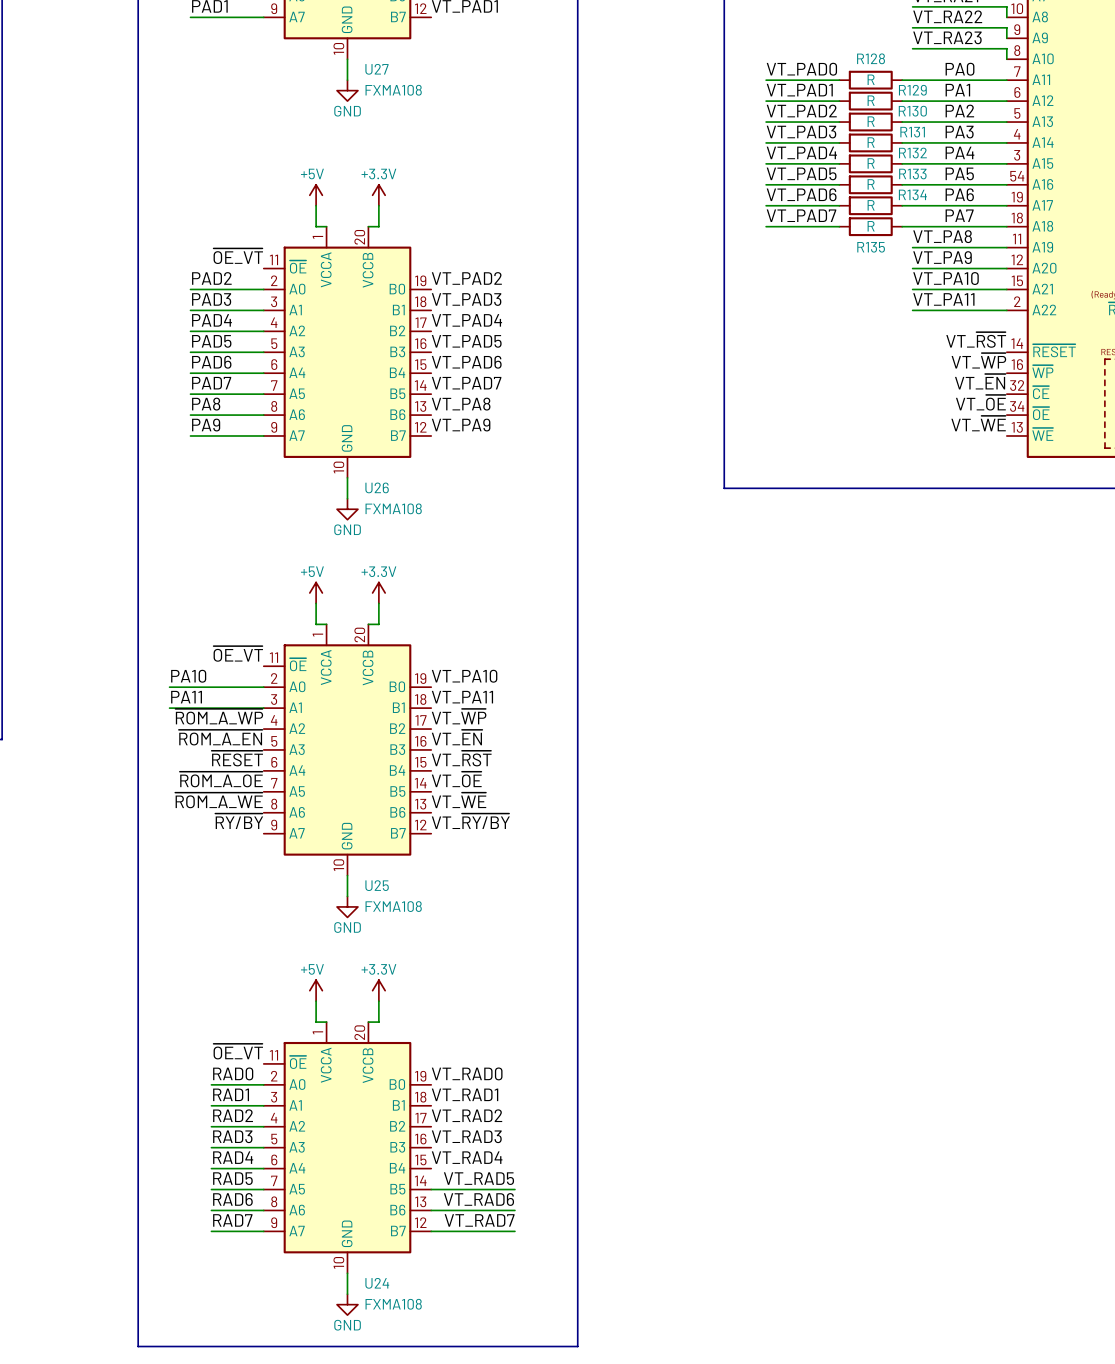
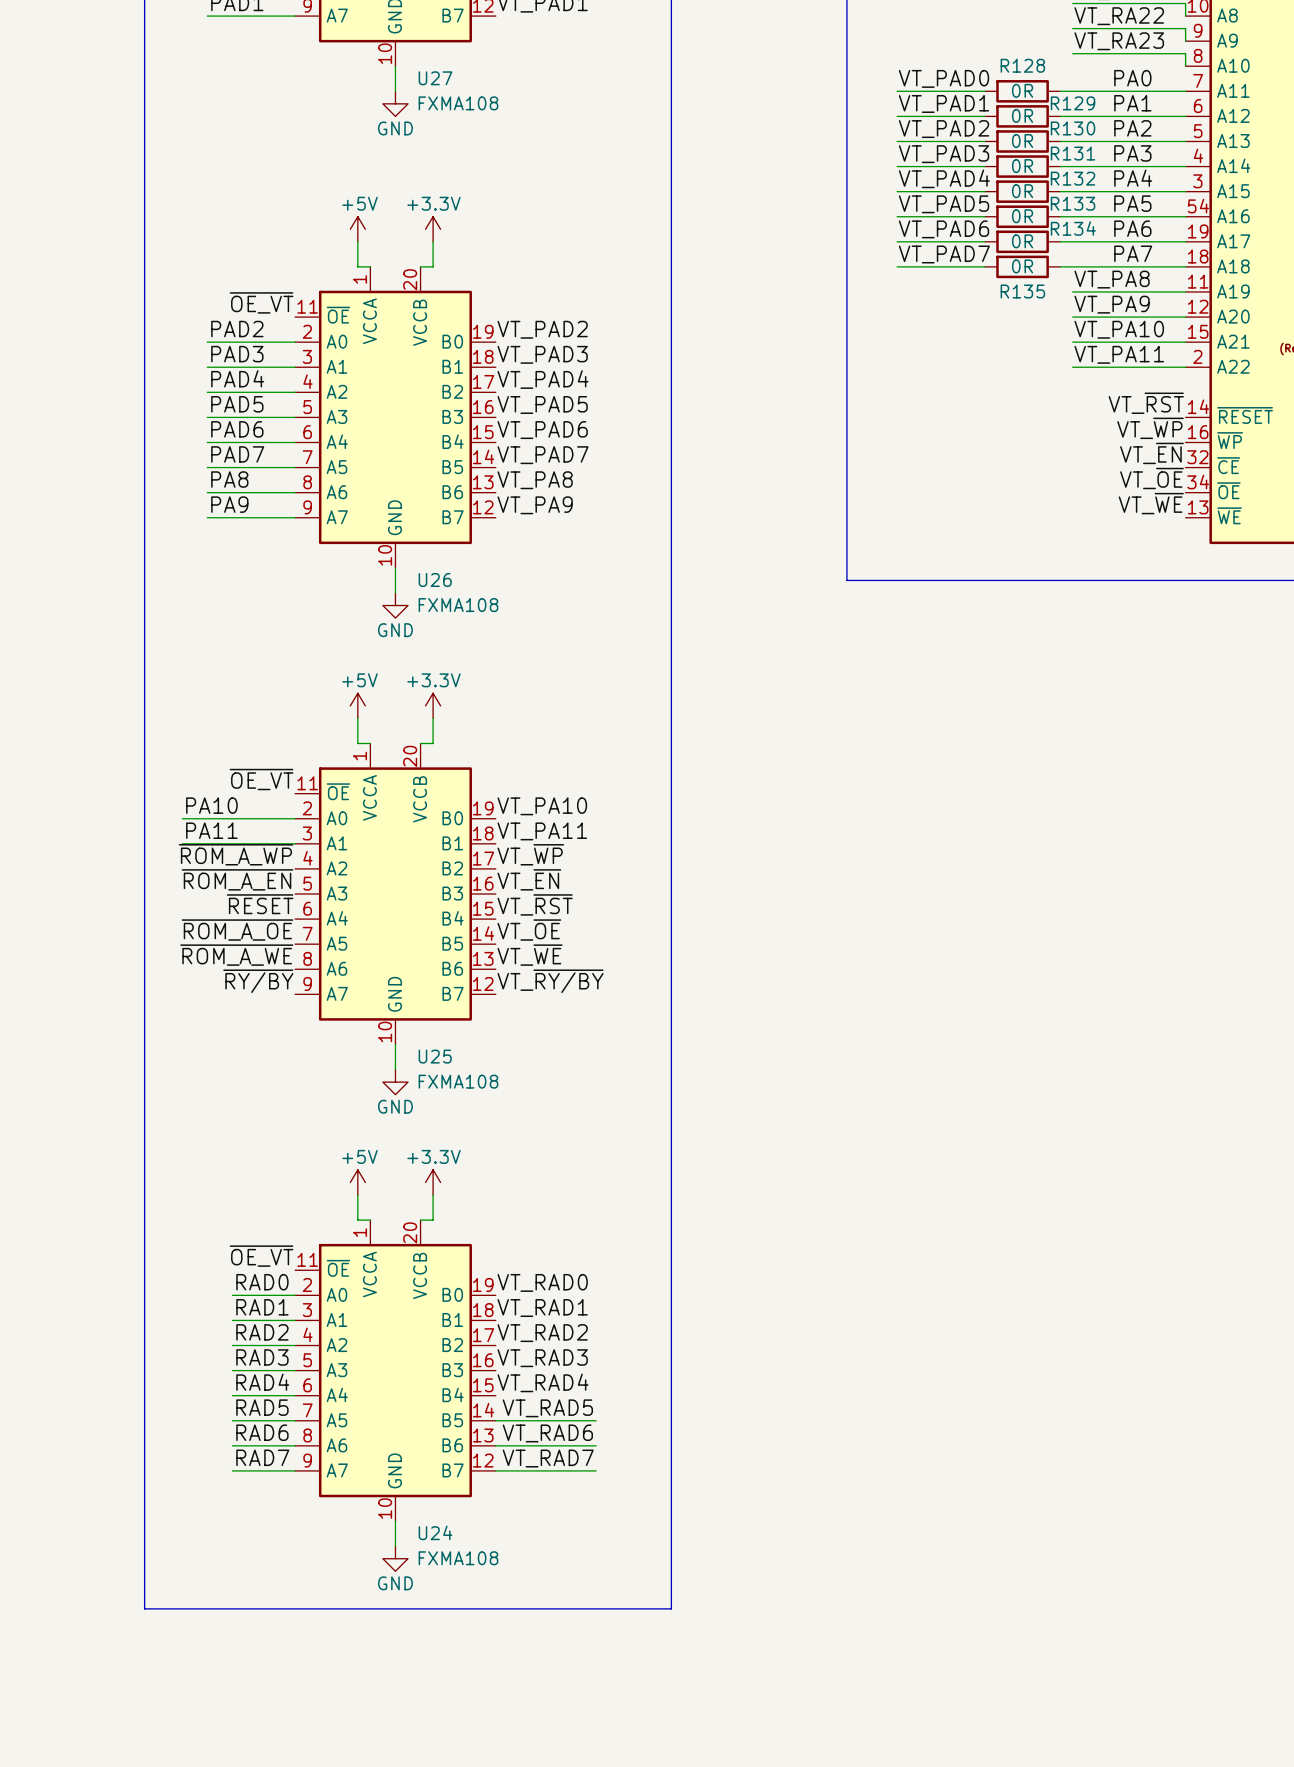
R128 value: R (871, 79) -> 0R (1022, 90)
R129 value: R (871, 100) -> 0R (1022, 115)
R130 value: R (871, 121) -> 0R (1022, 141)
R131 value: R (871, 142) -> 0R (1022, 166)
R132 value: R (871, 163) -> 0R (1022, 191)
R133 value: R (871, 184) -> 0R (1022, 216)
R134 value: R (871, 205) -> 0R (1022, 241)
R135 value: R (871, 226) -> 0R (1022, 266)

